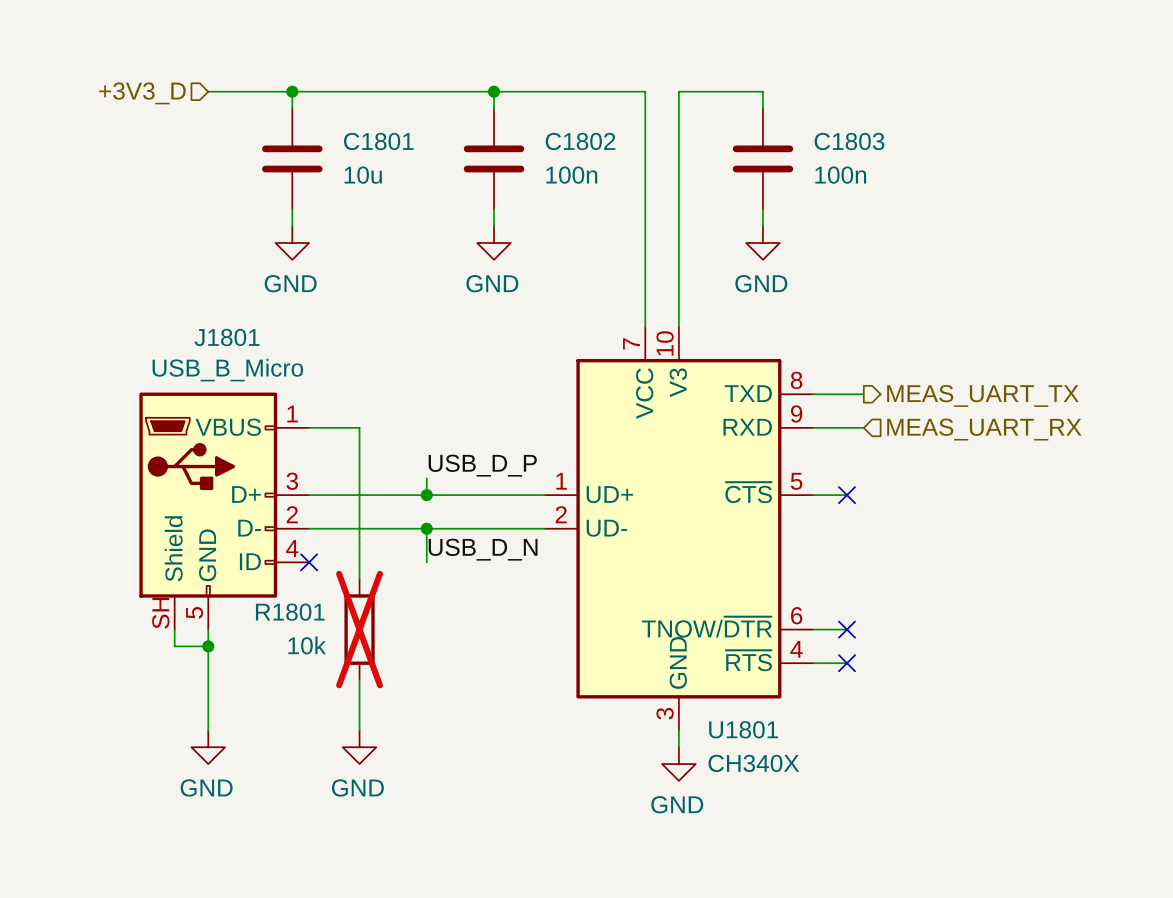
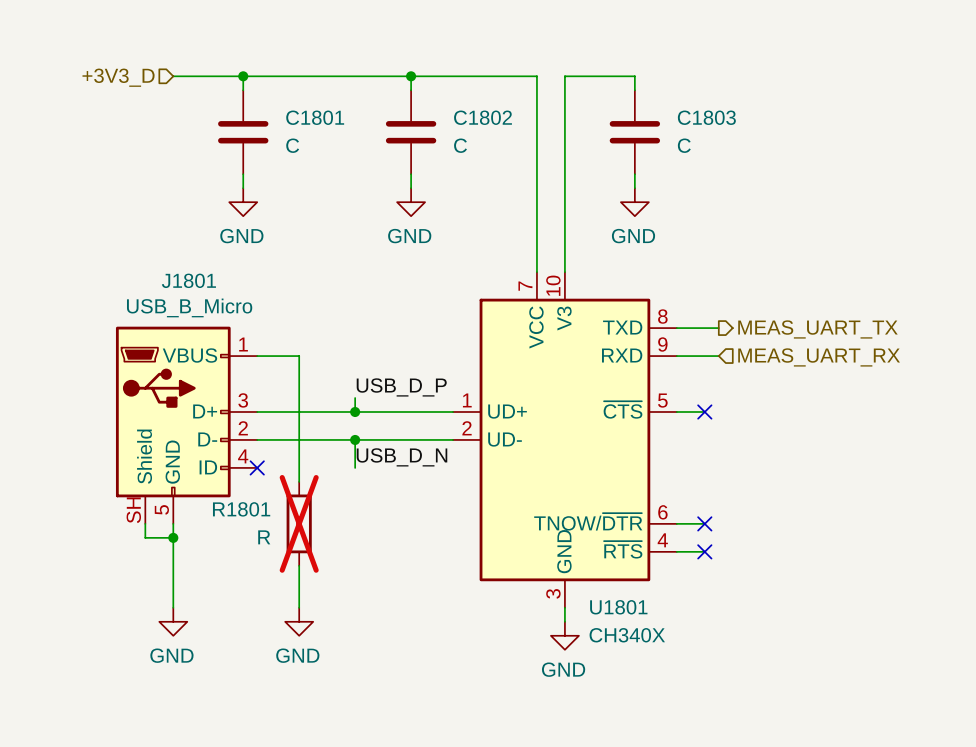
C1801 value: 10u (363, 175) -> C (292, 145)
C1802 value: 100n (571, 175) -> C (460, 145)
C1803 value: 100n (840, 175) -> C (684, 145)
R1801 value: 10k (307, 645) -> R (264, 537)

